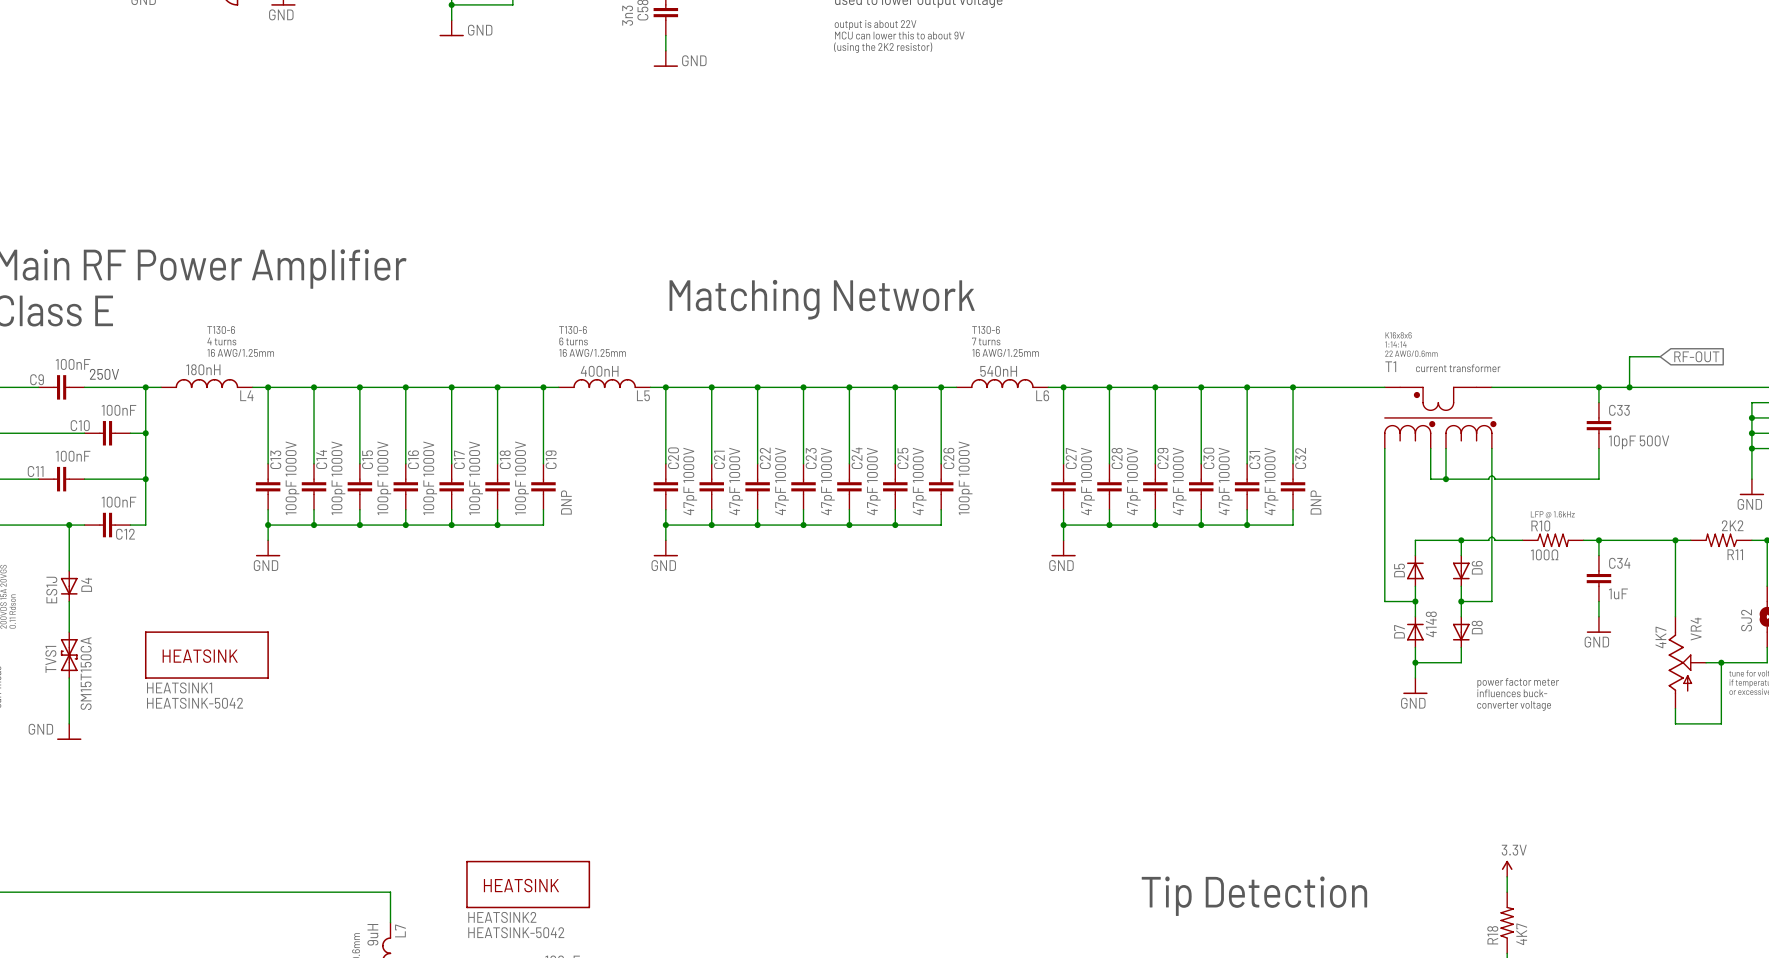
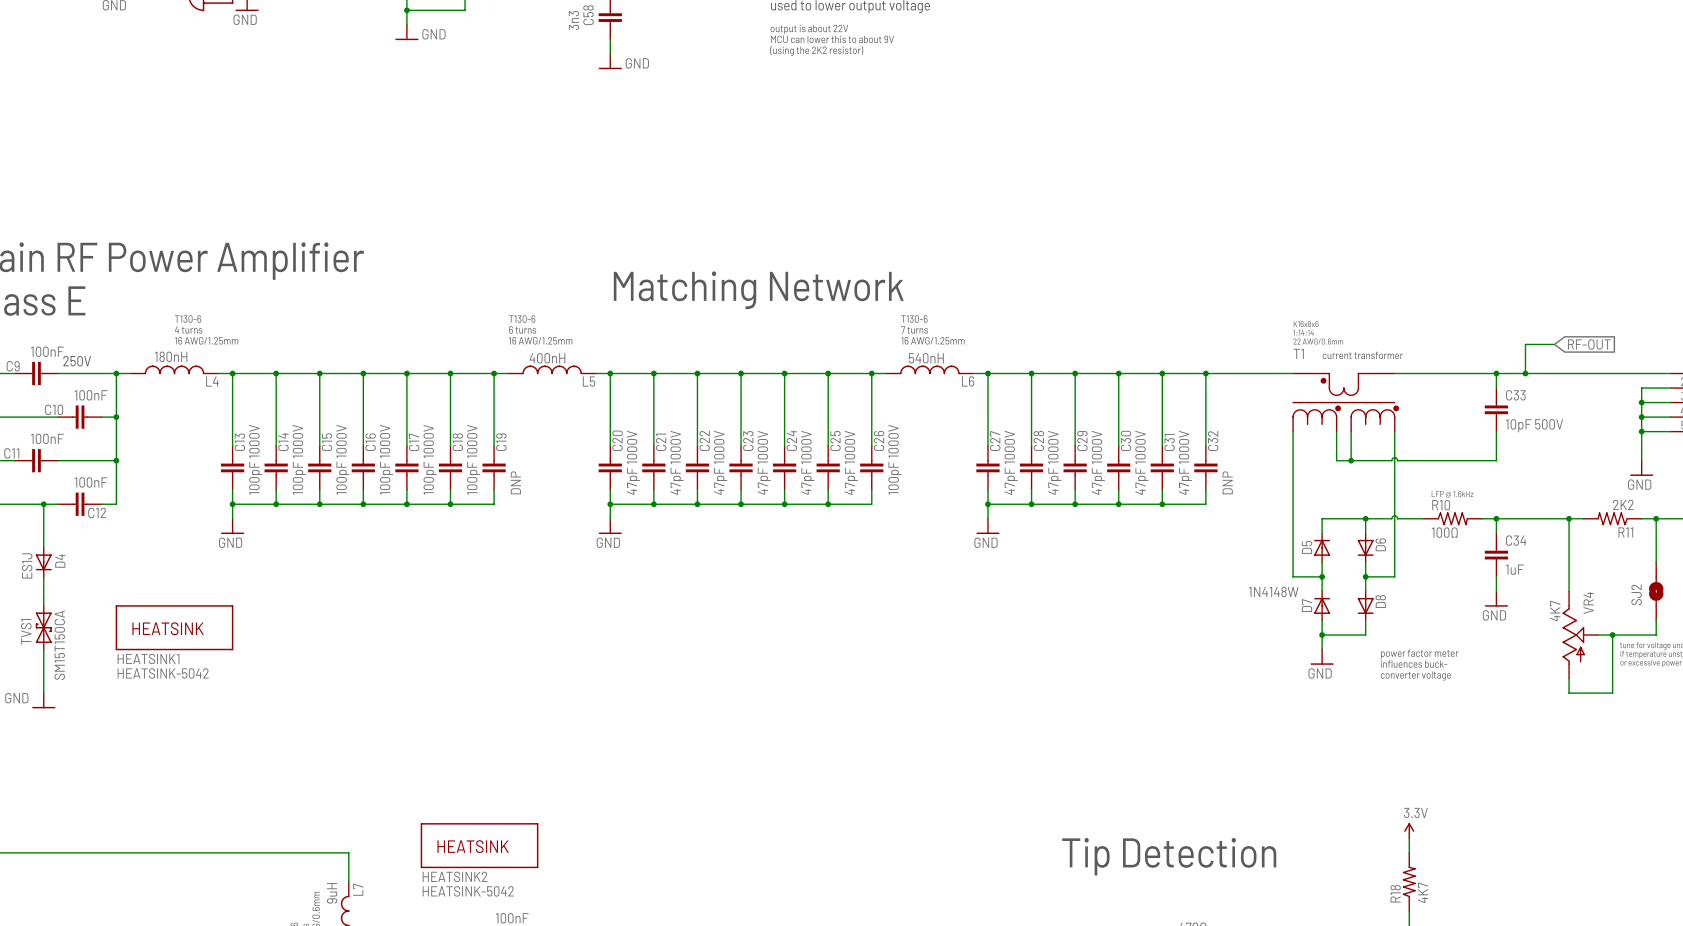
D7 value: 4148 (1431, 624) -> 1N4148W (1273, 591)

